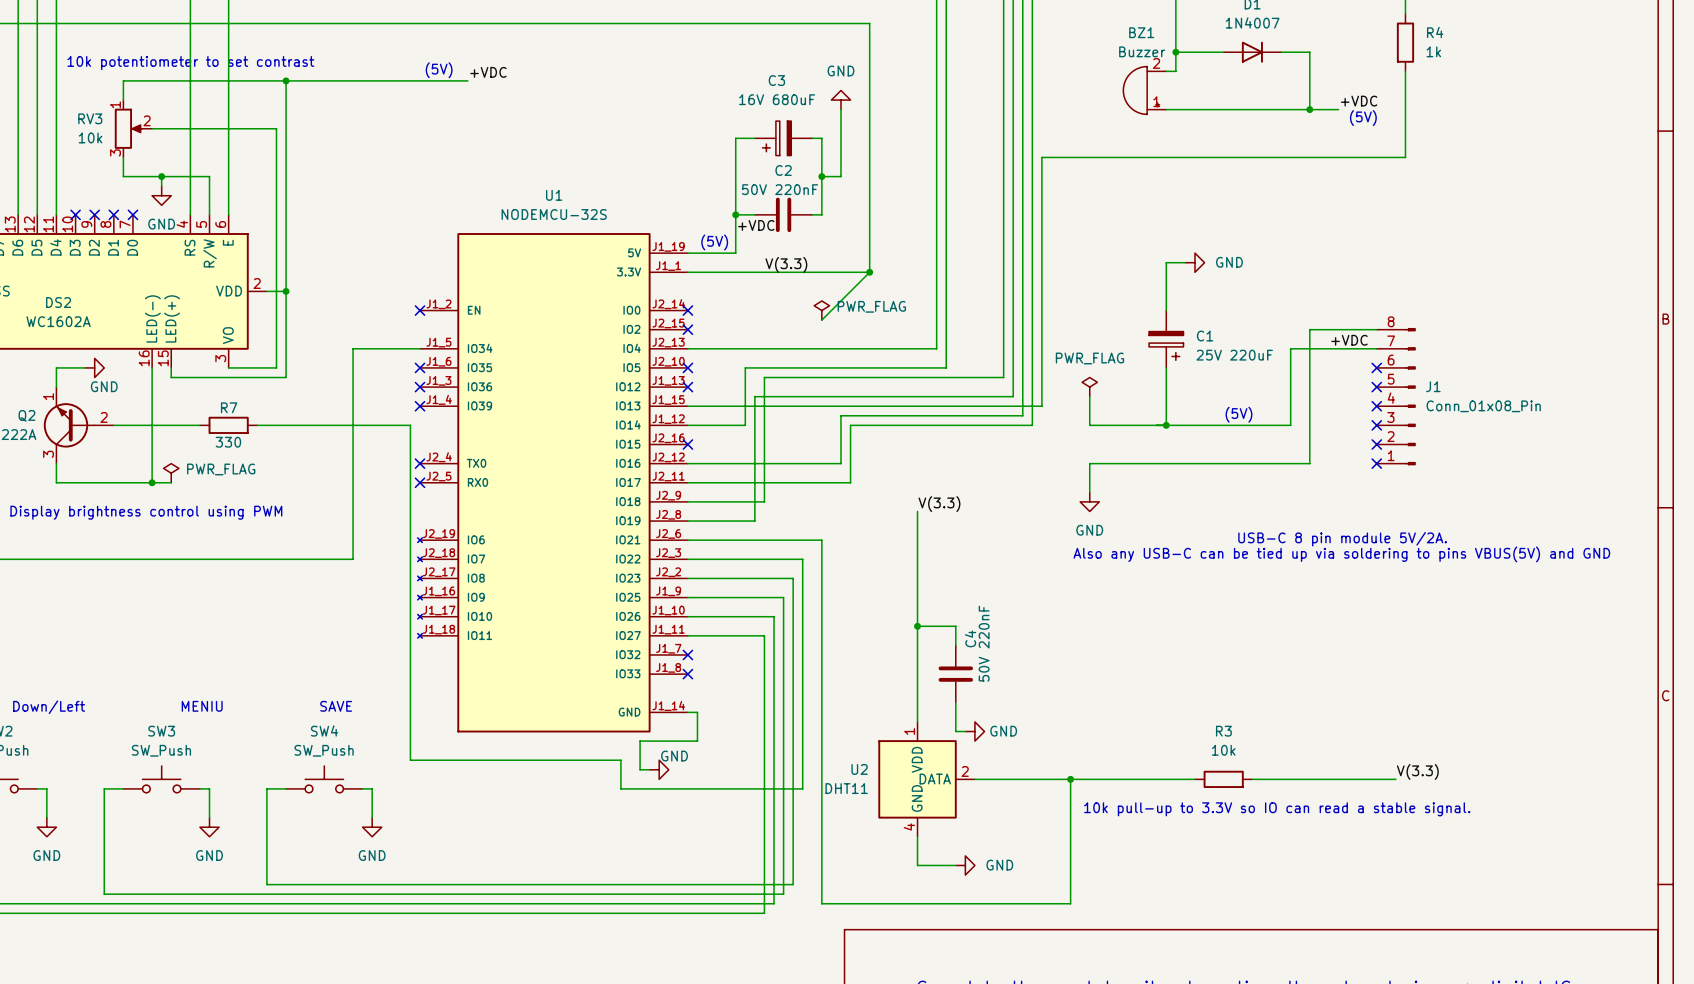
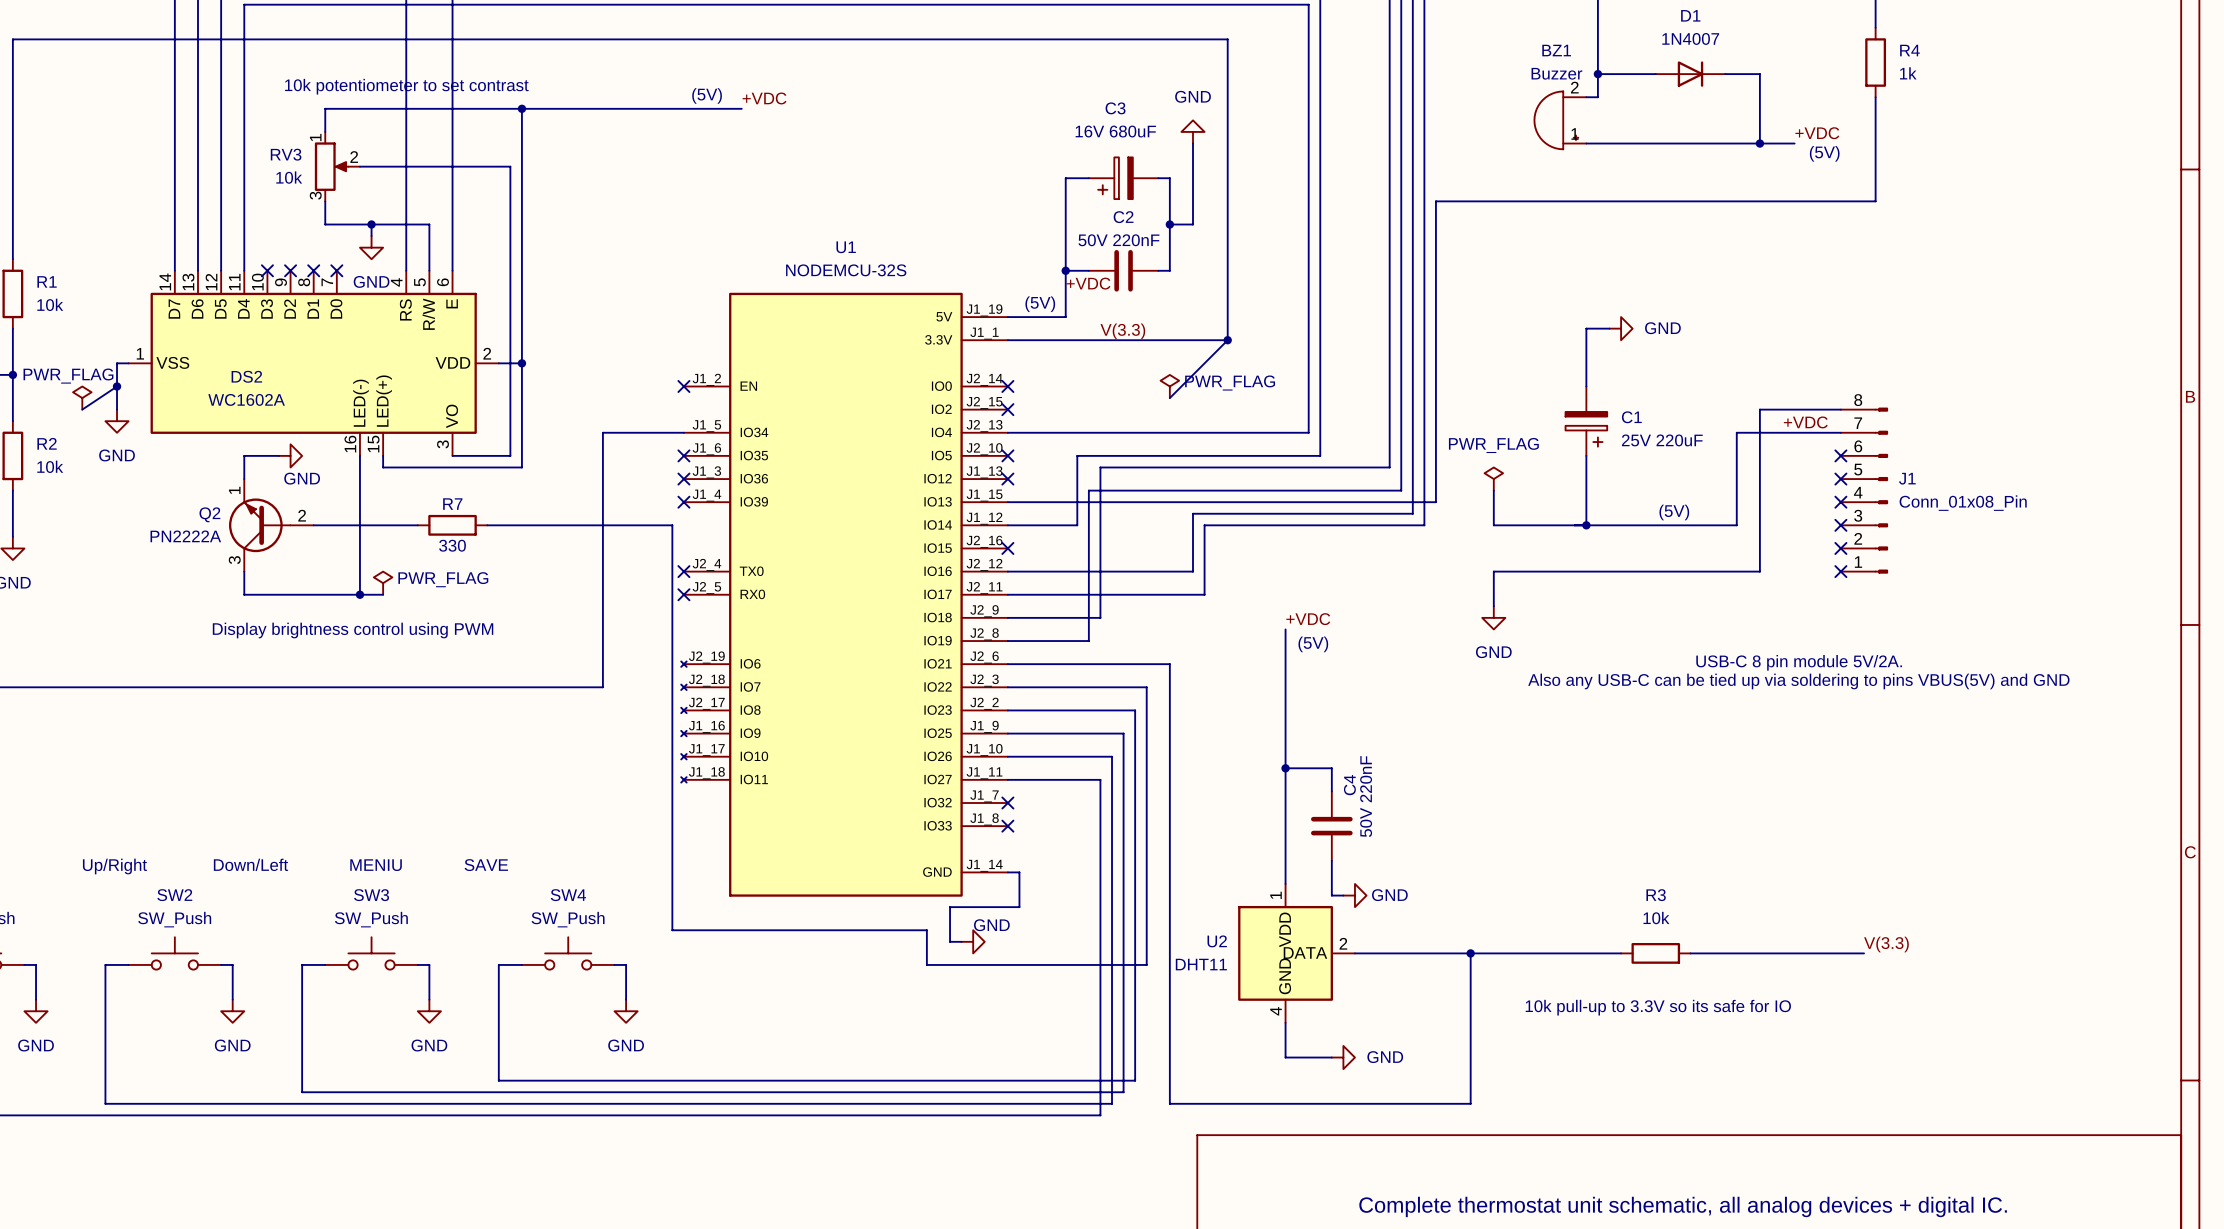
label: V(3.3) (939, 504) -> +VDC (1308, 619)
text: none -> (5V) (1313, 644)
text: 10k pull-up to 3.3V so IO can read a stable signal. (1277, 809) -> none
text: none -> 10k pull-up to 3.3V so its safe for IO (1658, 1007)

